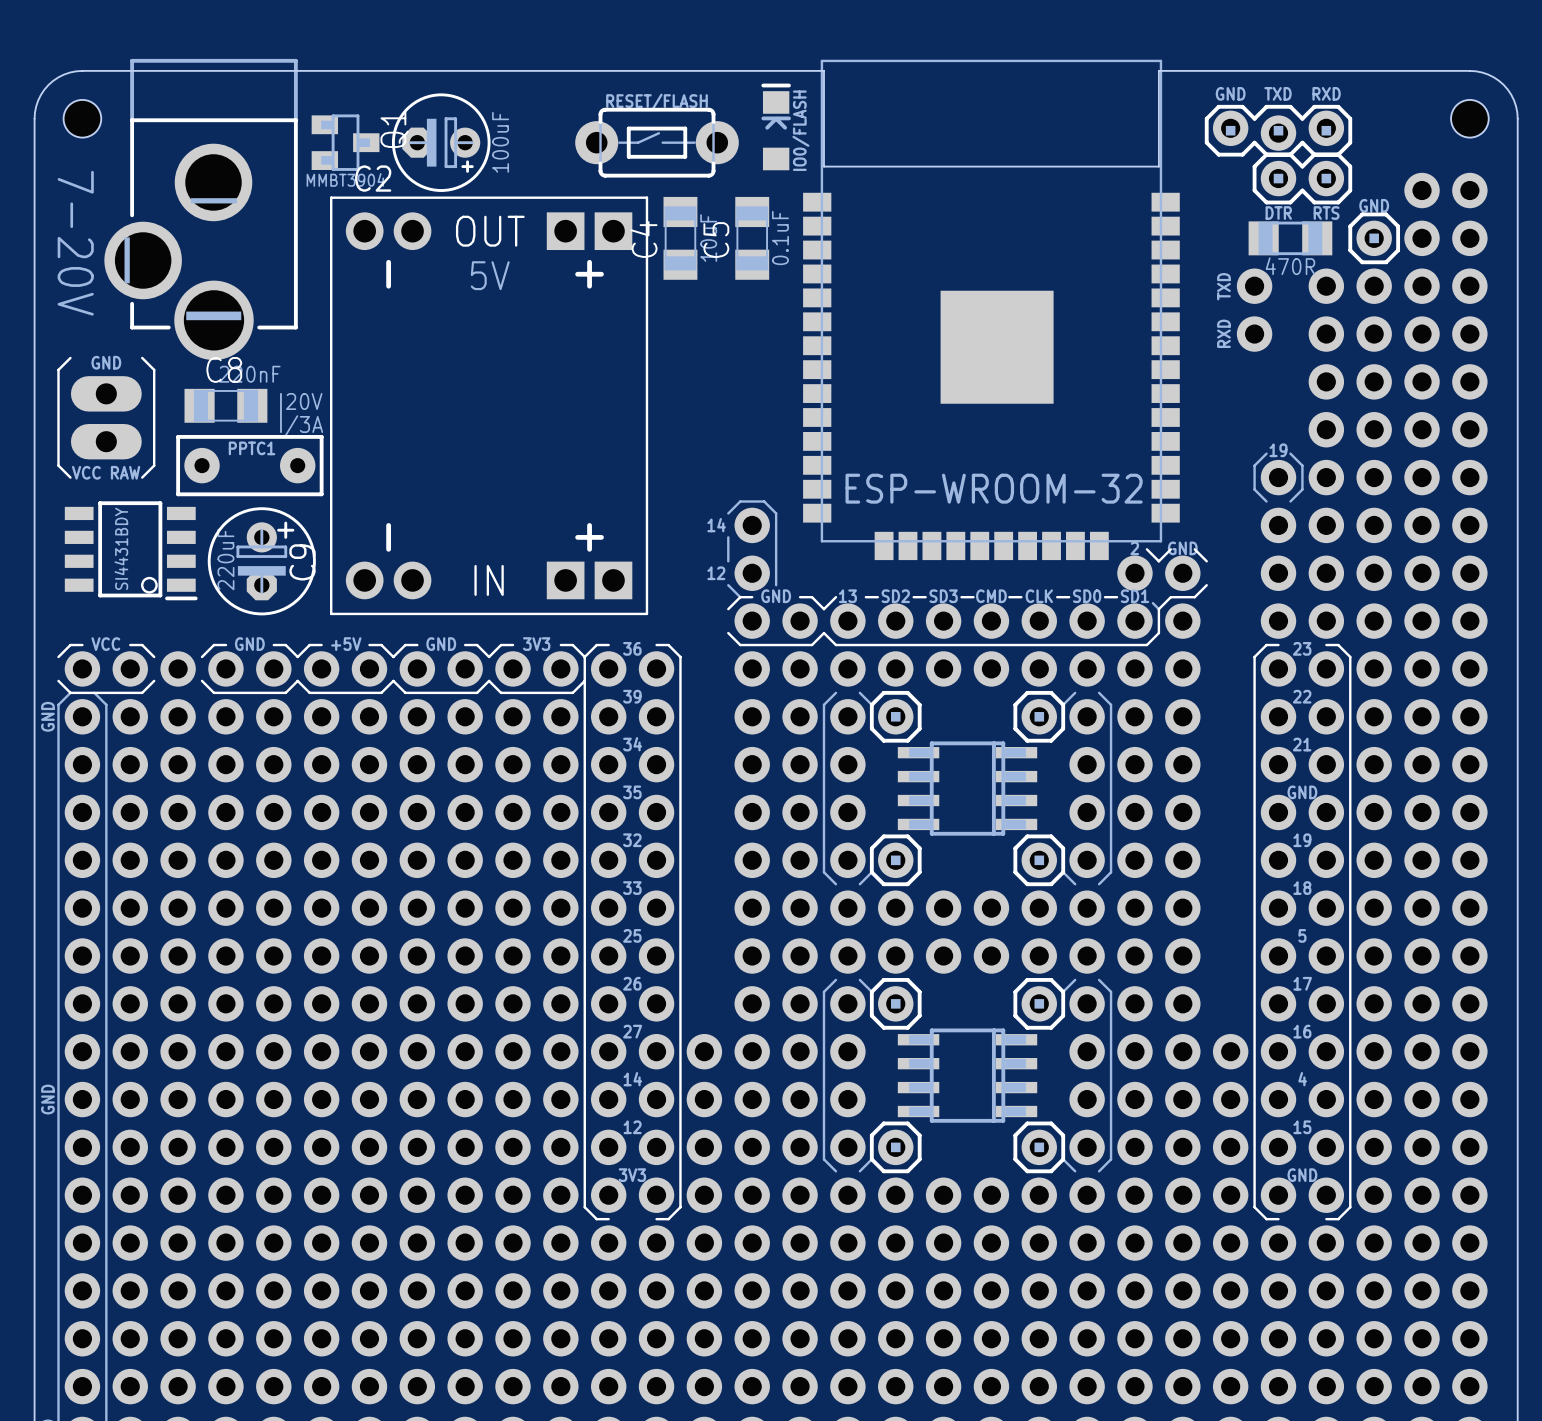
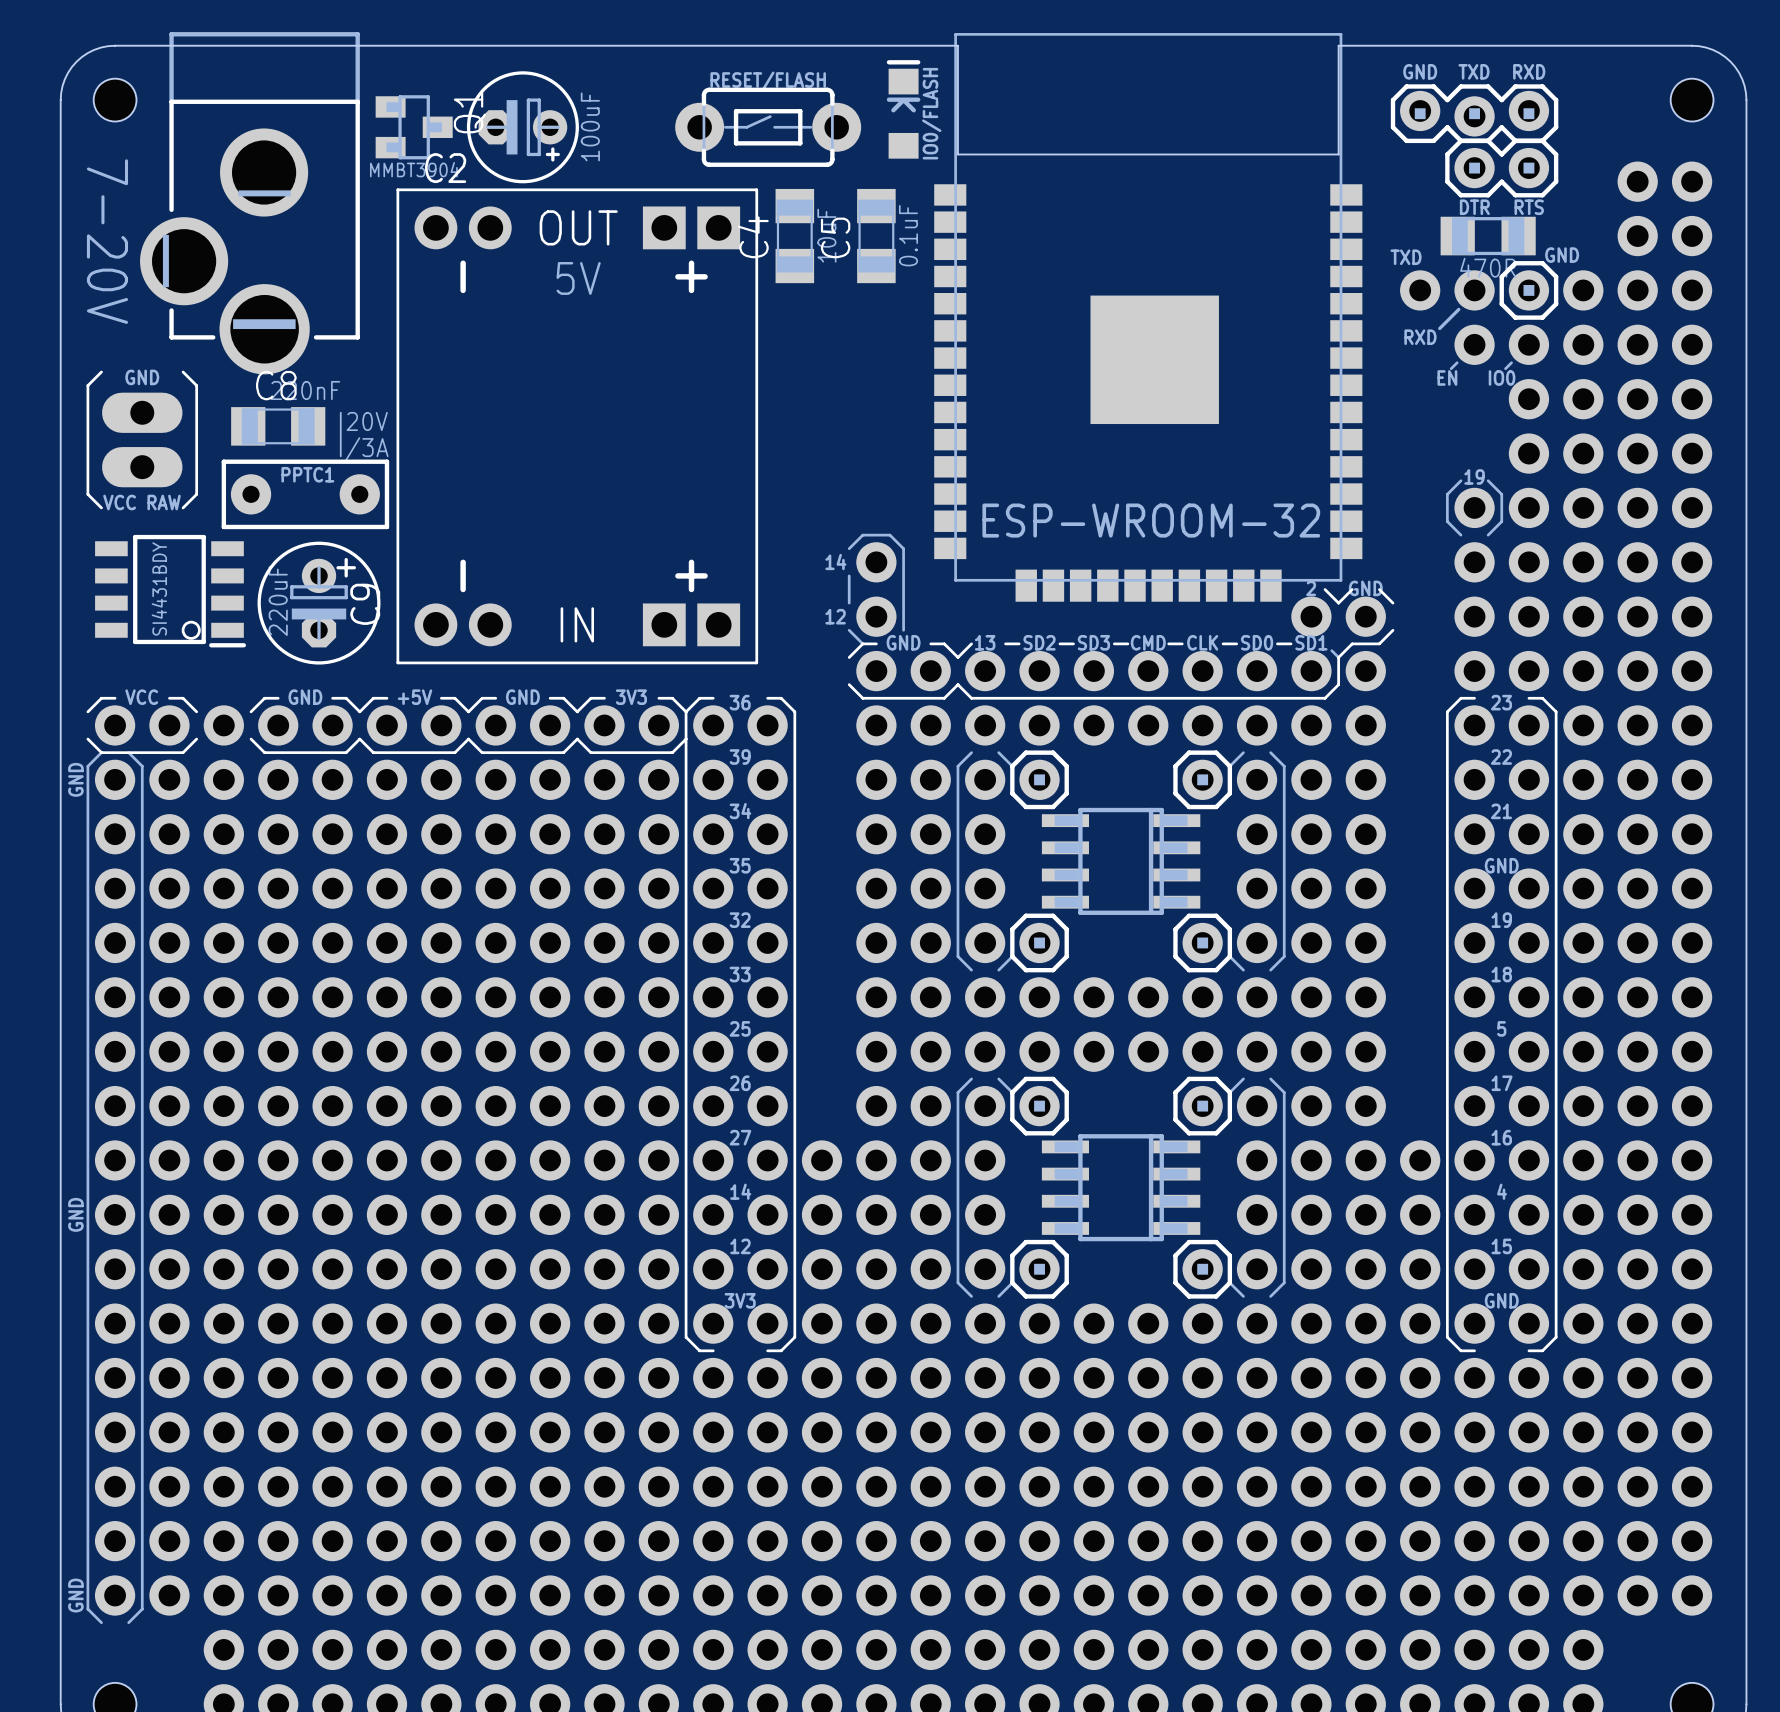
text position: GND (1374, 205) -> GND (1562, 255)
part position: (1374, 238) -> (1528, 290)
text rotation: 0° (1223, 286) -> 90° clockwise (1406, 257)
line: none -> (1458, 309) (1439, 328)
part rotation: 0° (1254, 310) -> 90° clockwise (1447, 290)
part: (1326, 310) -> none
text rotation: 0° (1223, 333) -> 90° clockwise (1420, 337)
part: none -> (1501, 344)
line: none -> (1457, 362) (1451, 368)
line: none -> (1511, 362) (1505, 368)
text: none -> EN (1447, 377)
text: none -> IO0 (1502, 377)

